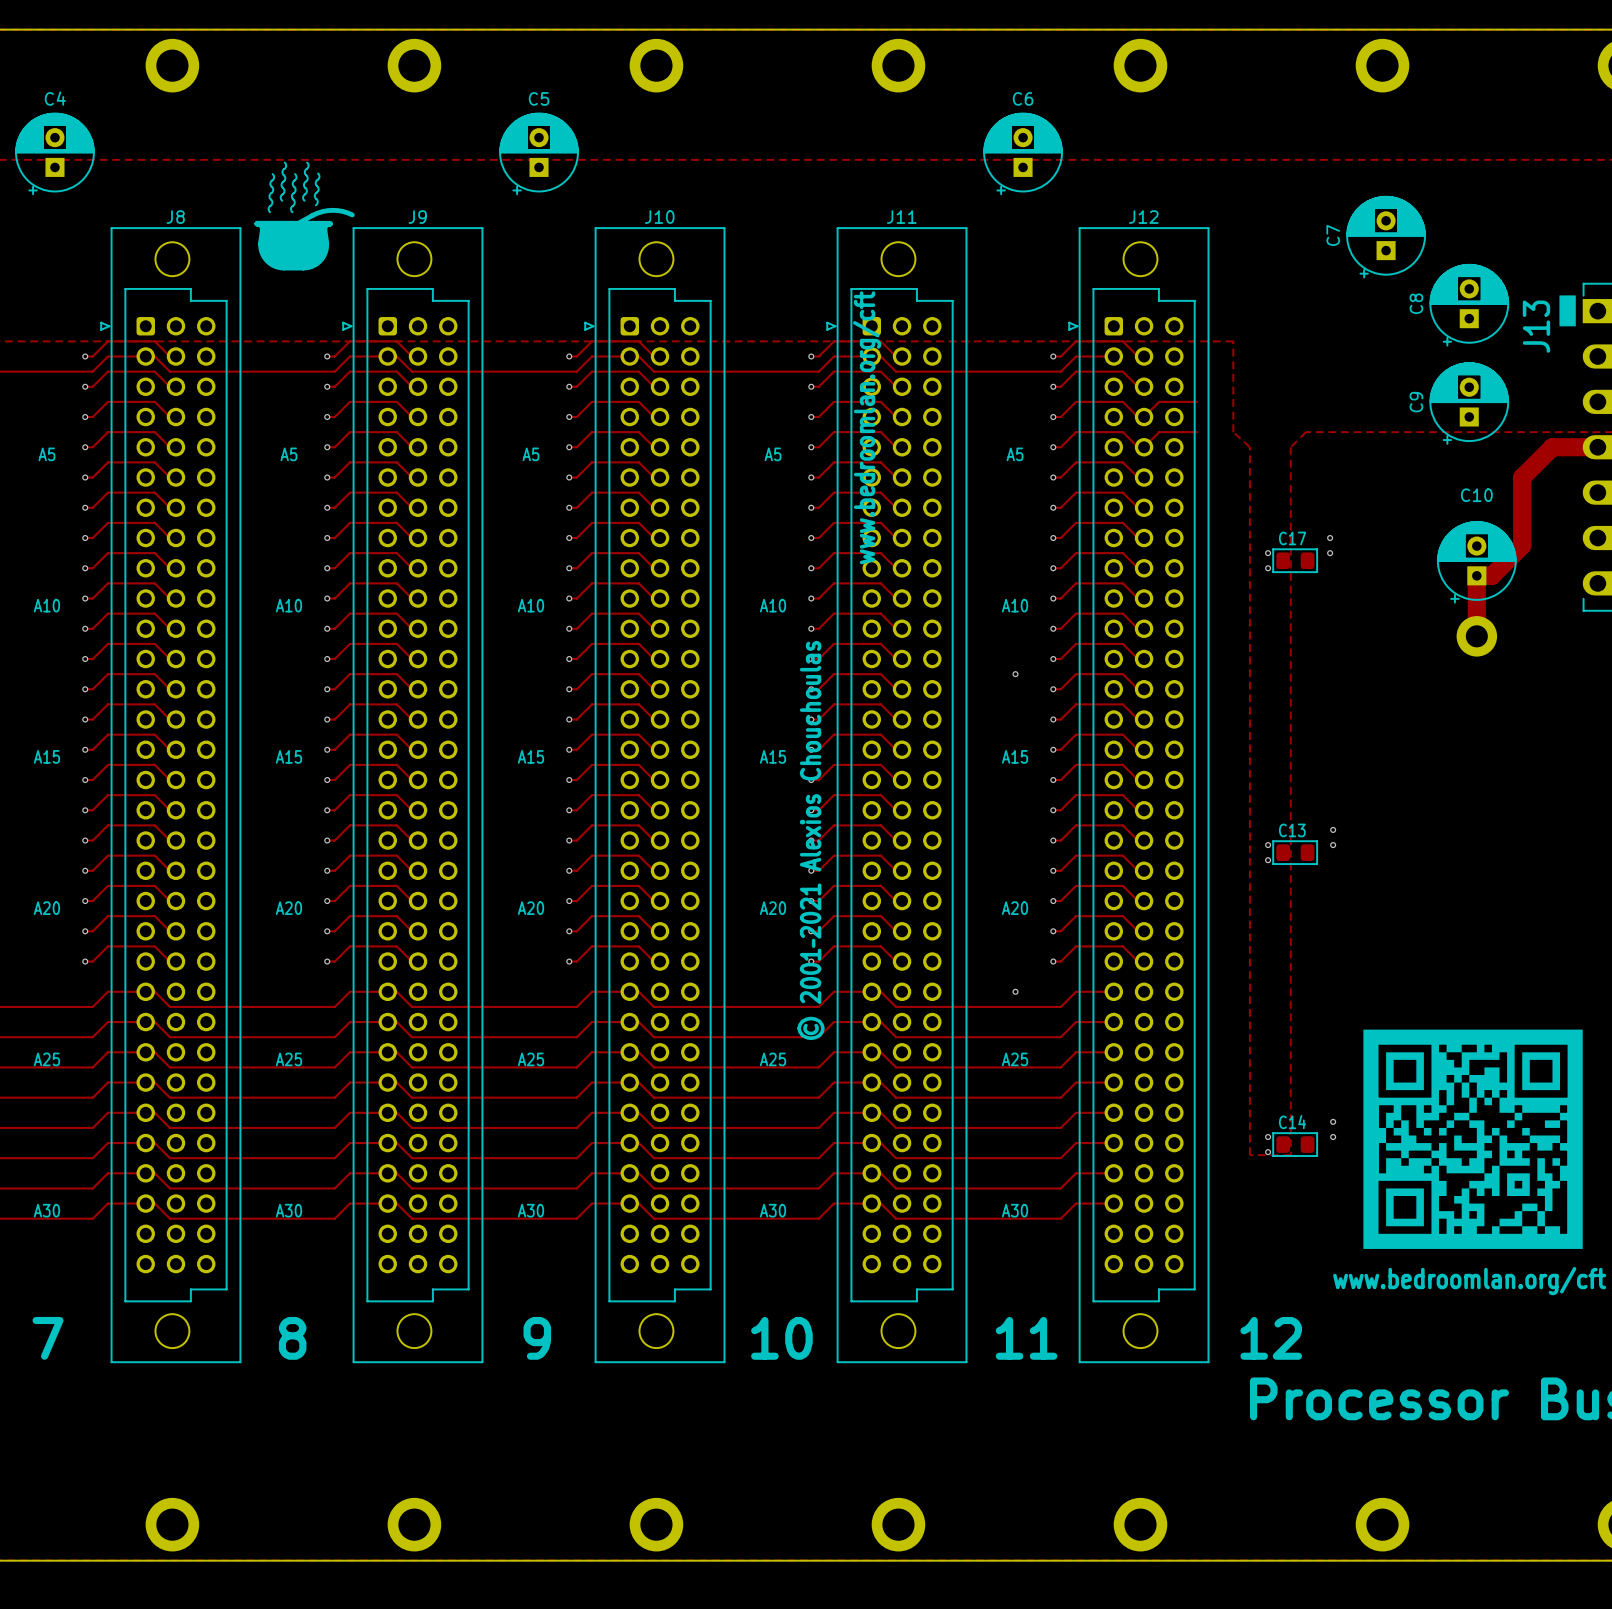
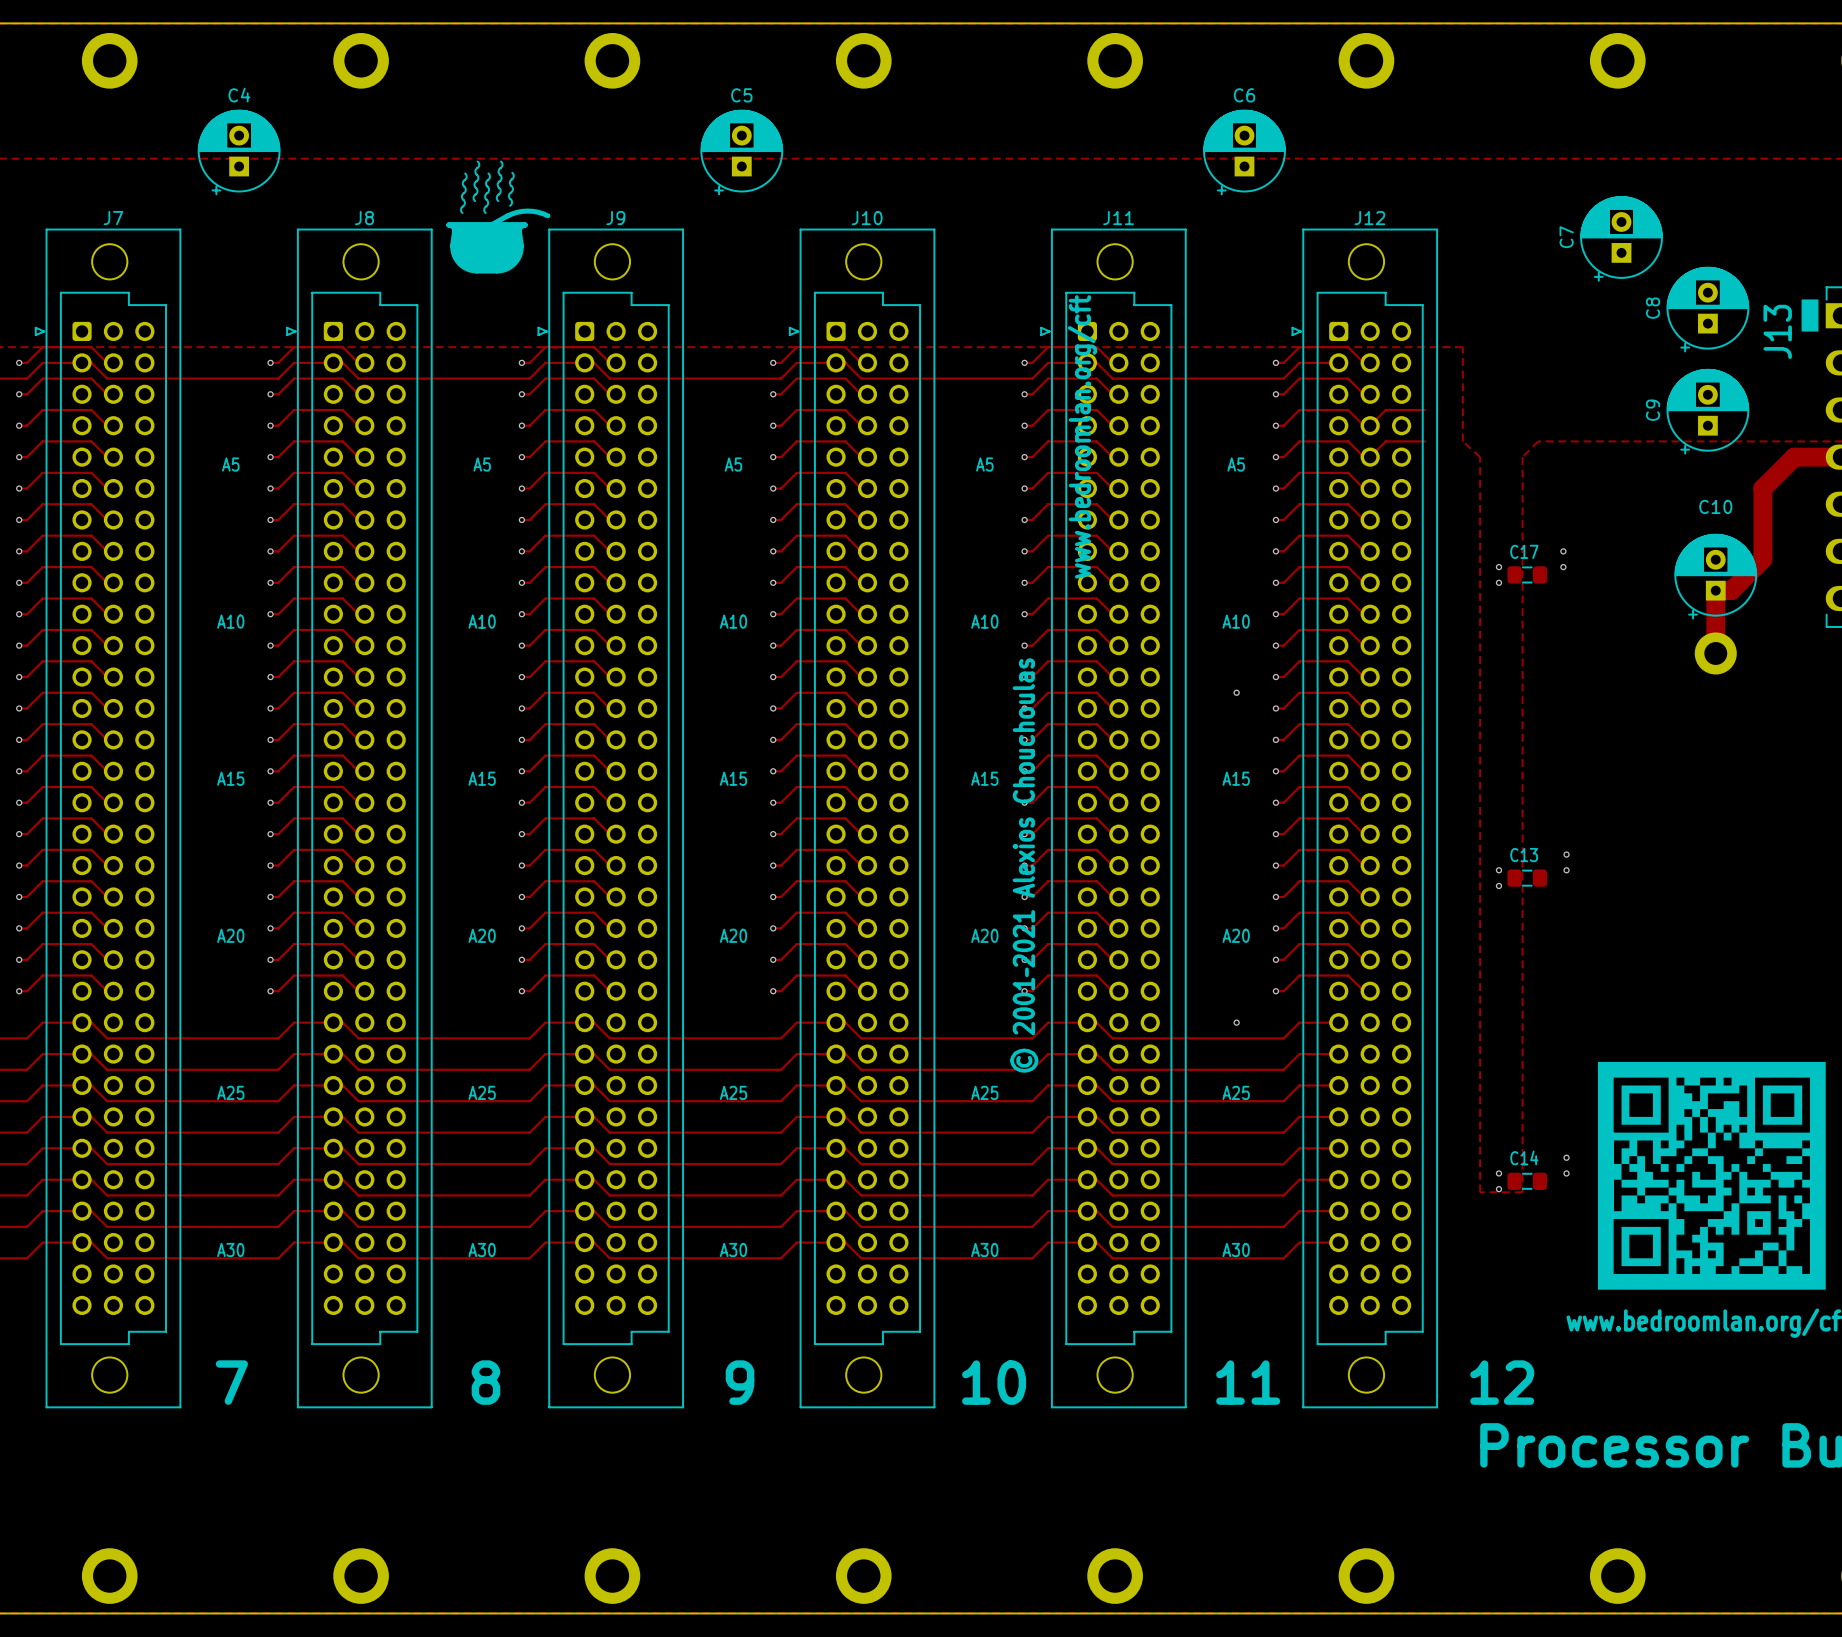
C17 footprint: [1272, 548, 1318, 573] -> [1507, 566, 1548, 584]
C13 footprint: [1272, 840, 1318, 865] -> [1507, 869, 1548, 887]
C14 footprint: [1272, 1132, 1318, 1157] -> [1507, 1172, 1548, 1190]

